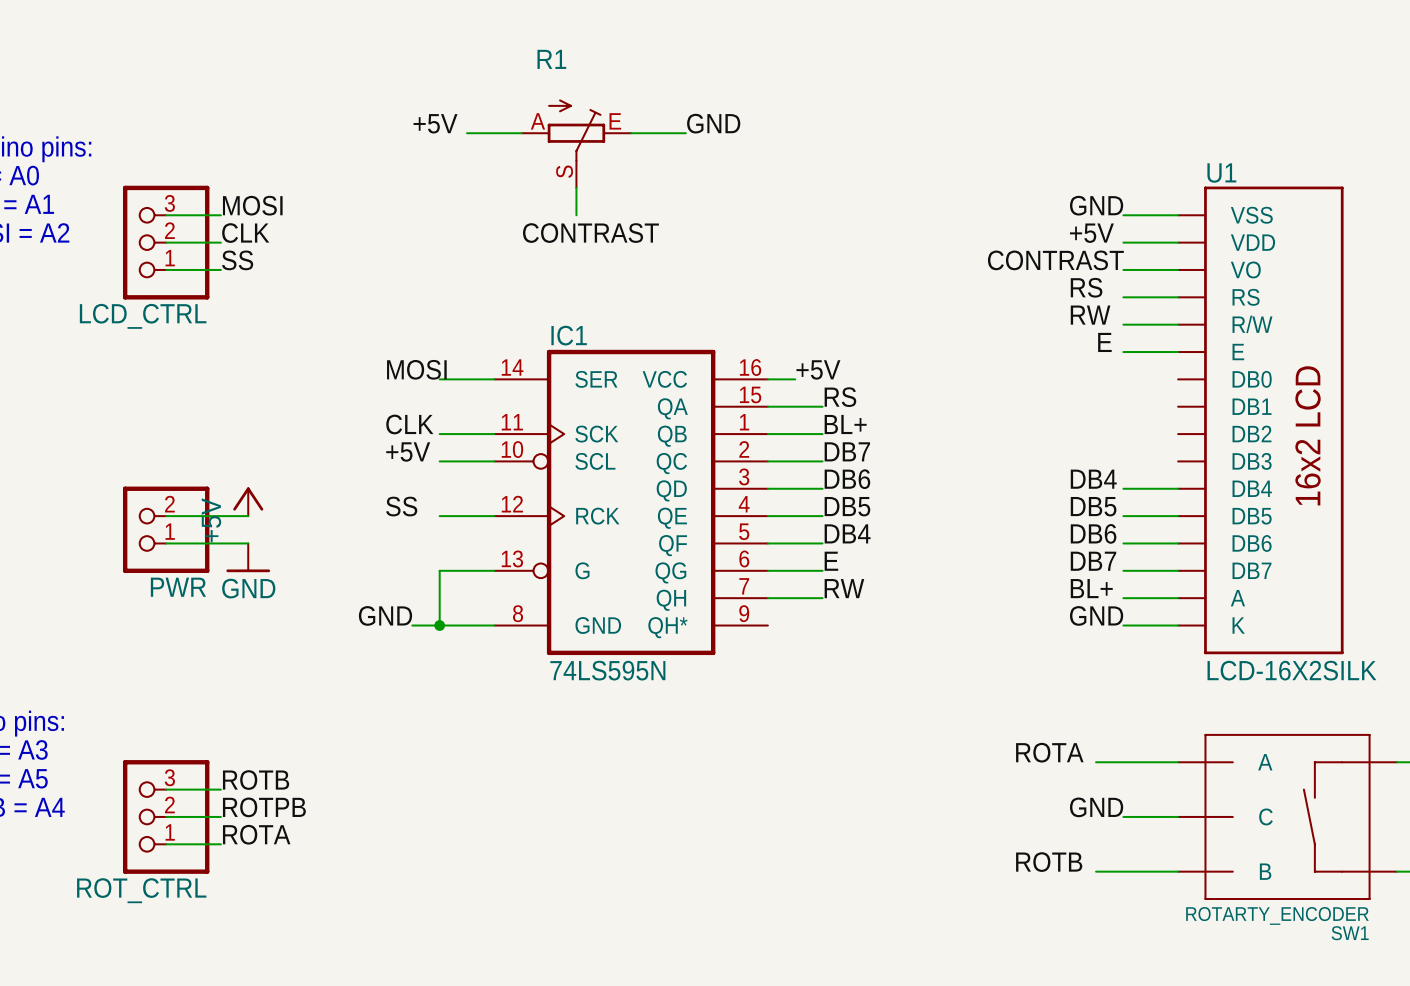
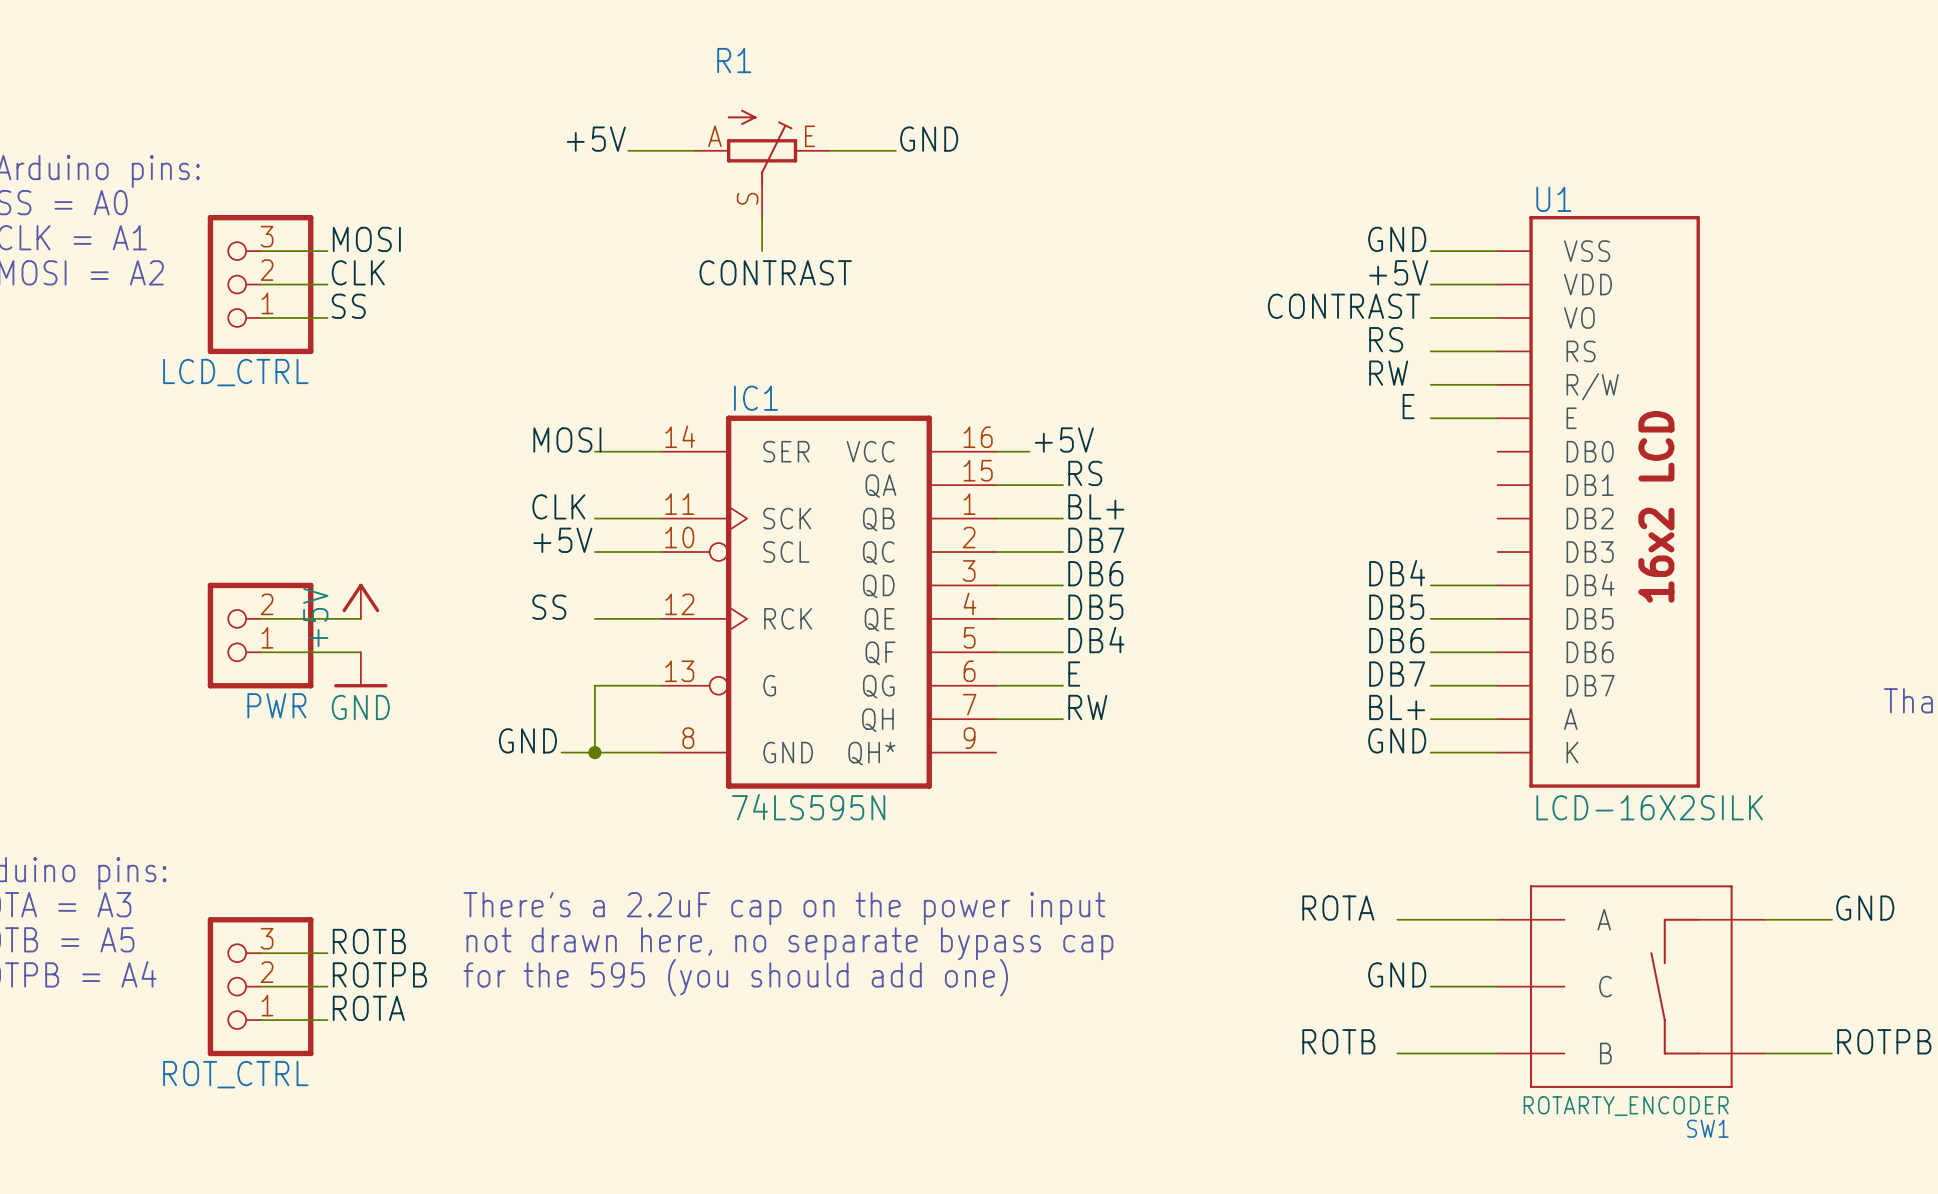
text: none -> There's a 2.2uF cap on the power input (784, 908)
text: none -> not drawn here, no separate bypass cap (789, 943)
text: none -> for the 595 (you should add one) (735, 977)

